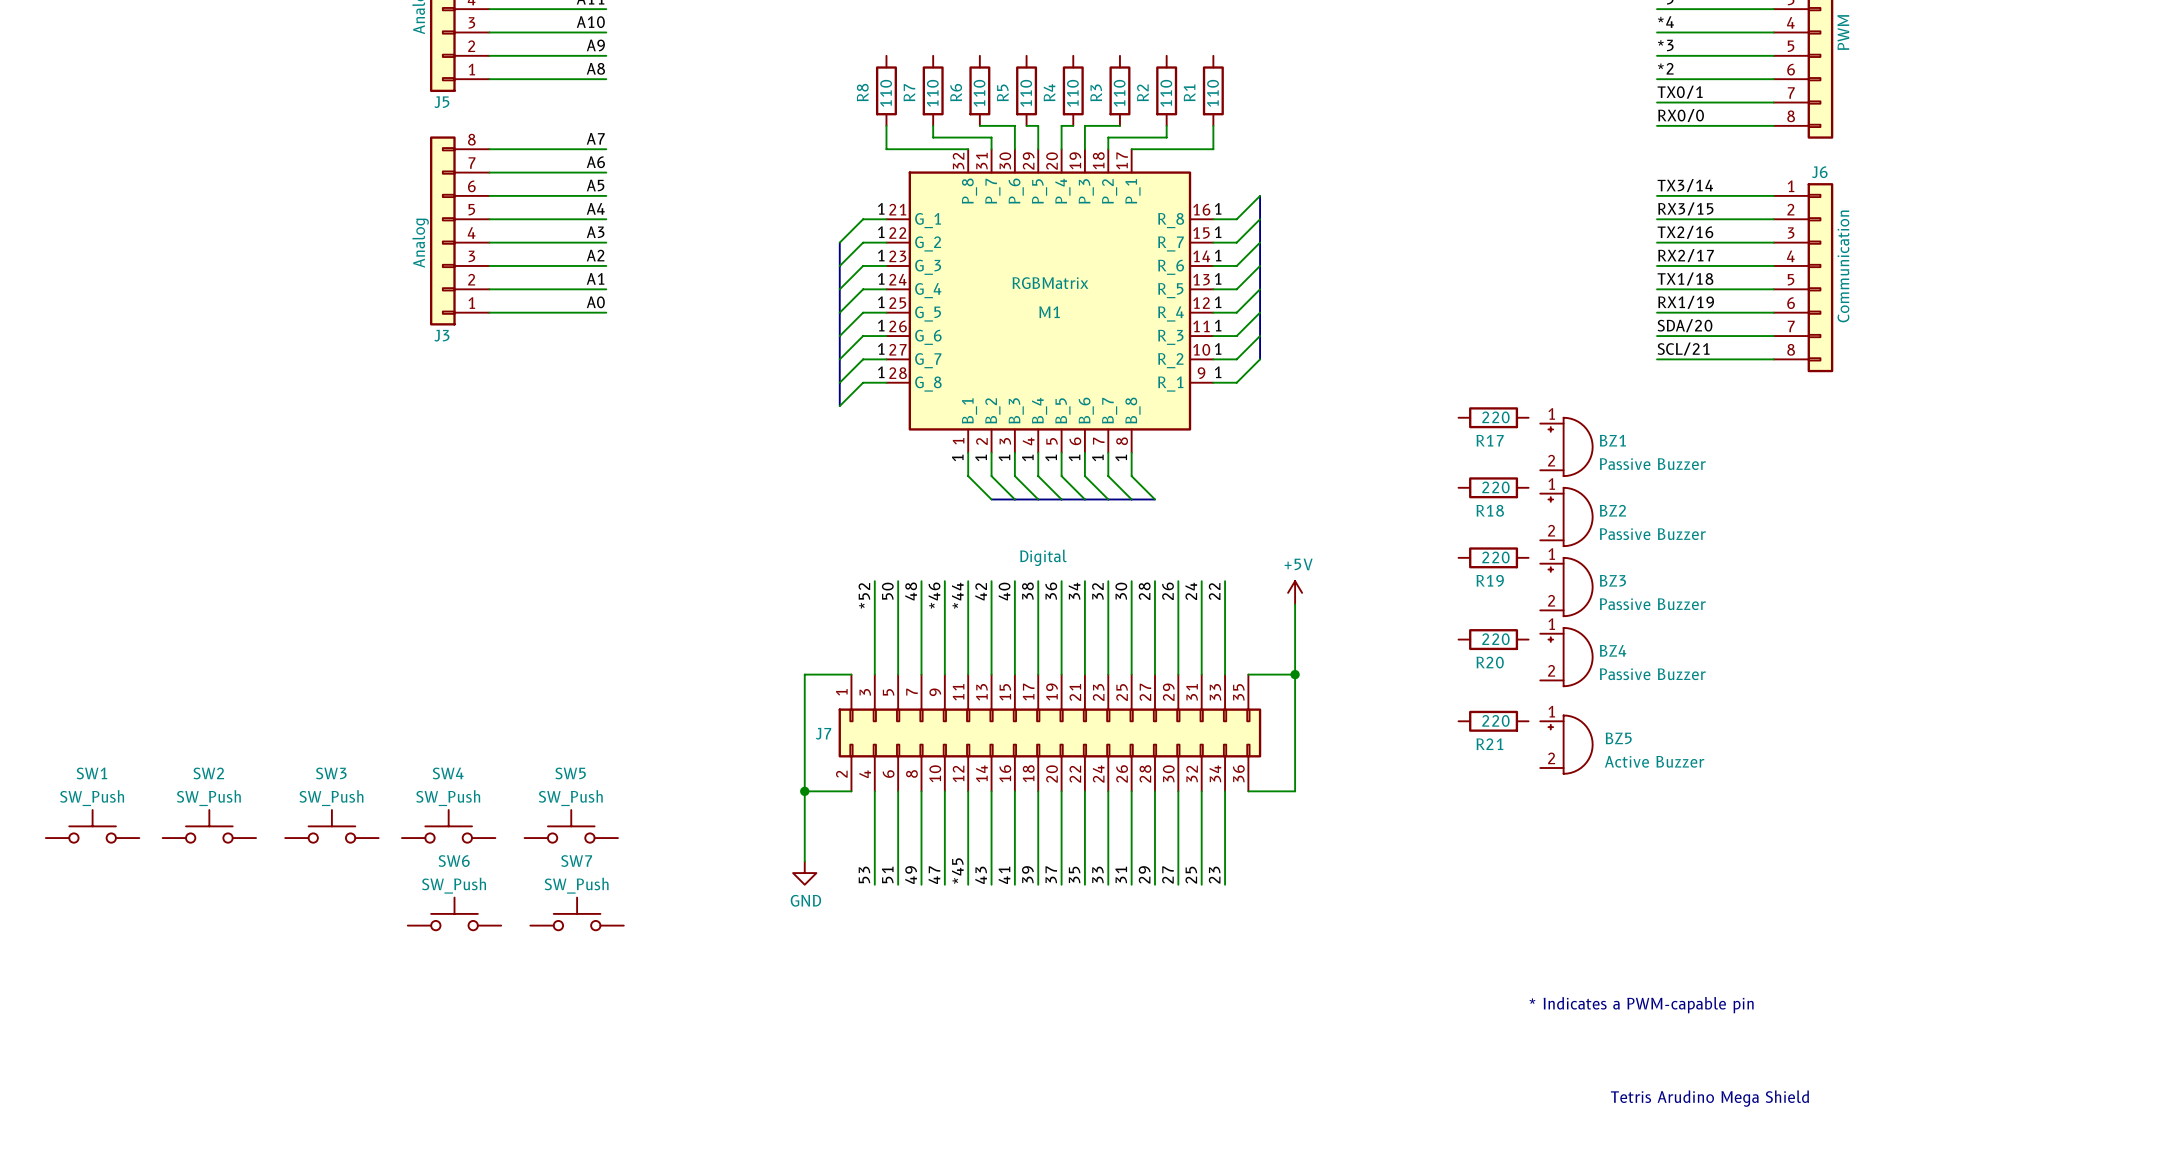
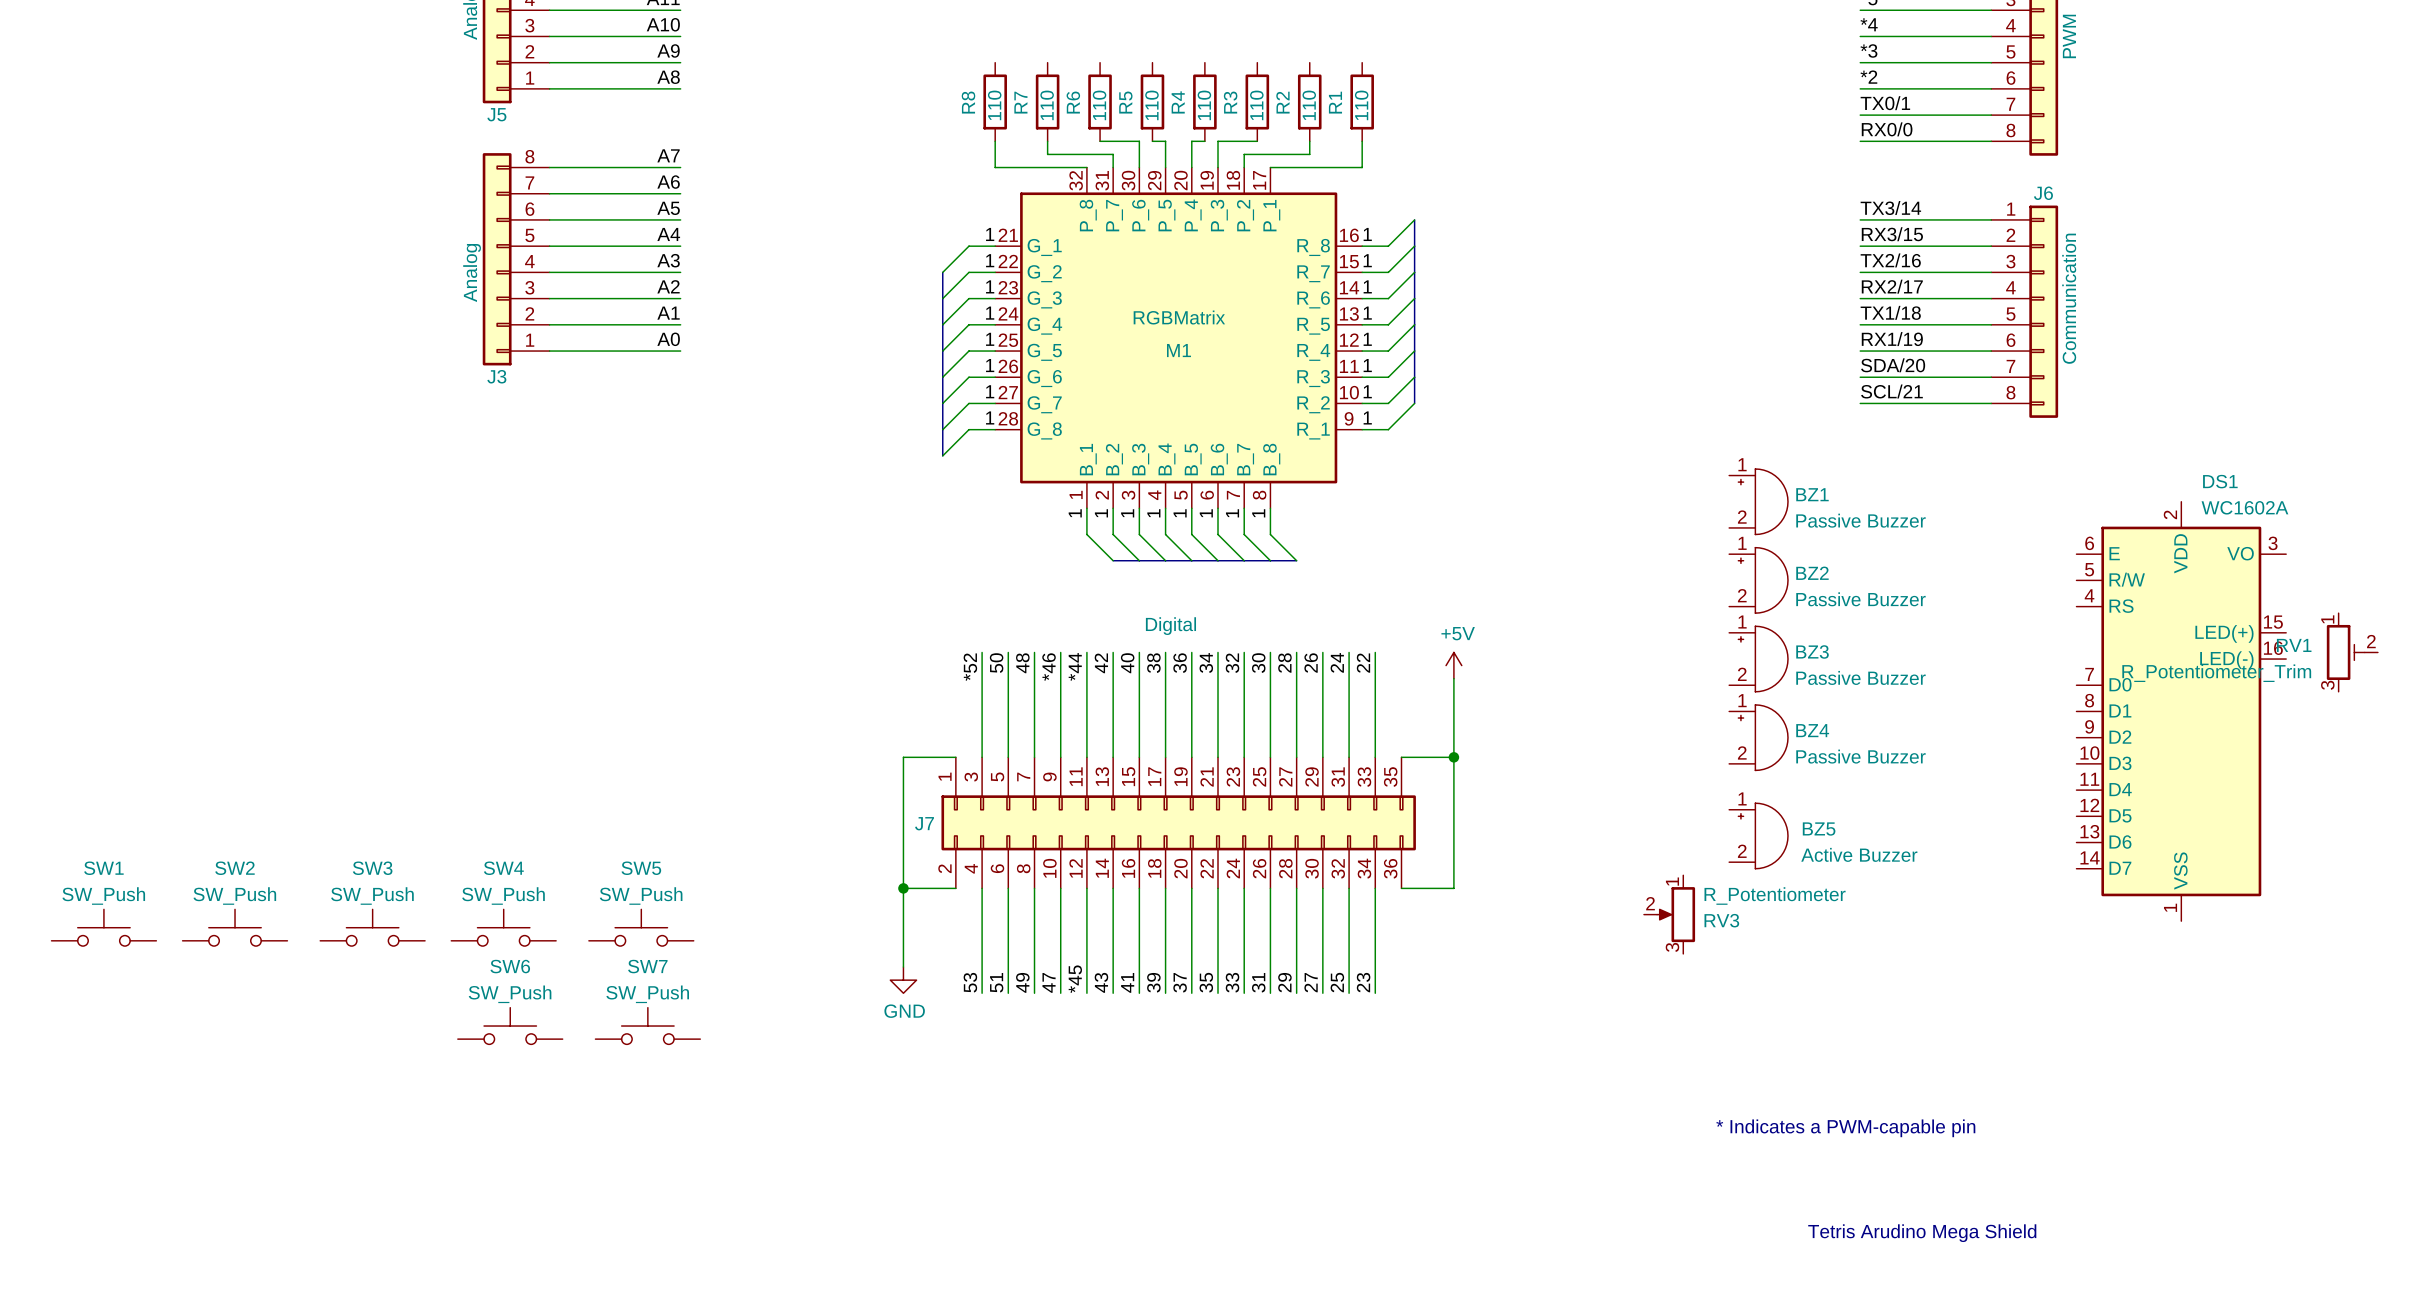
R17: 220 (1493, 417) -> none
R18: 220 (1493, 487) -> none
R19: 220 (1493, 557) -> none
RV1: none -> R_Potentiometer_Trim (2352, 652)
DS1: none -> WC1602A (2181, 711)
R20: 220 (1493, 639) -> none
R21: 220 (1493, 721) -> none
RV3: none -> R_Potentiometer (1669, 914)

